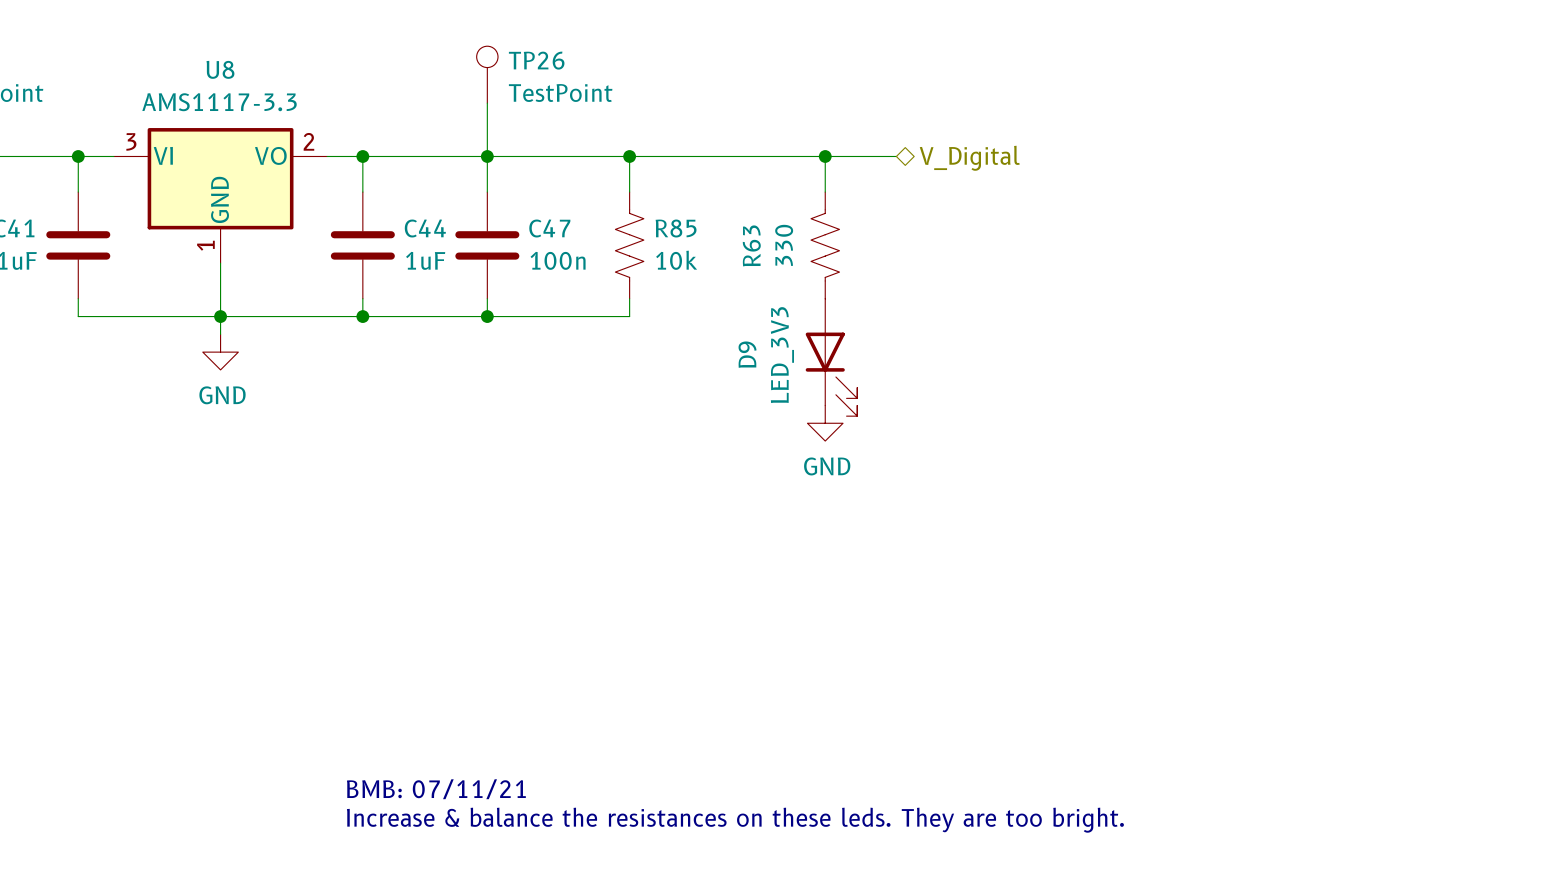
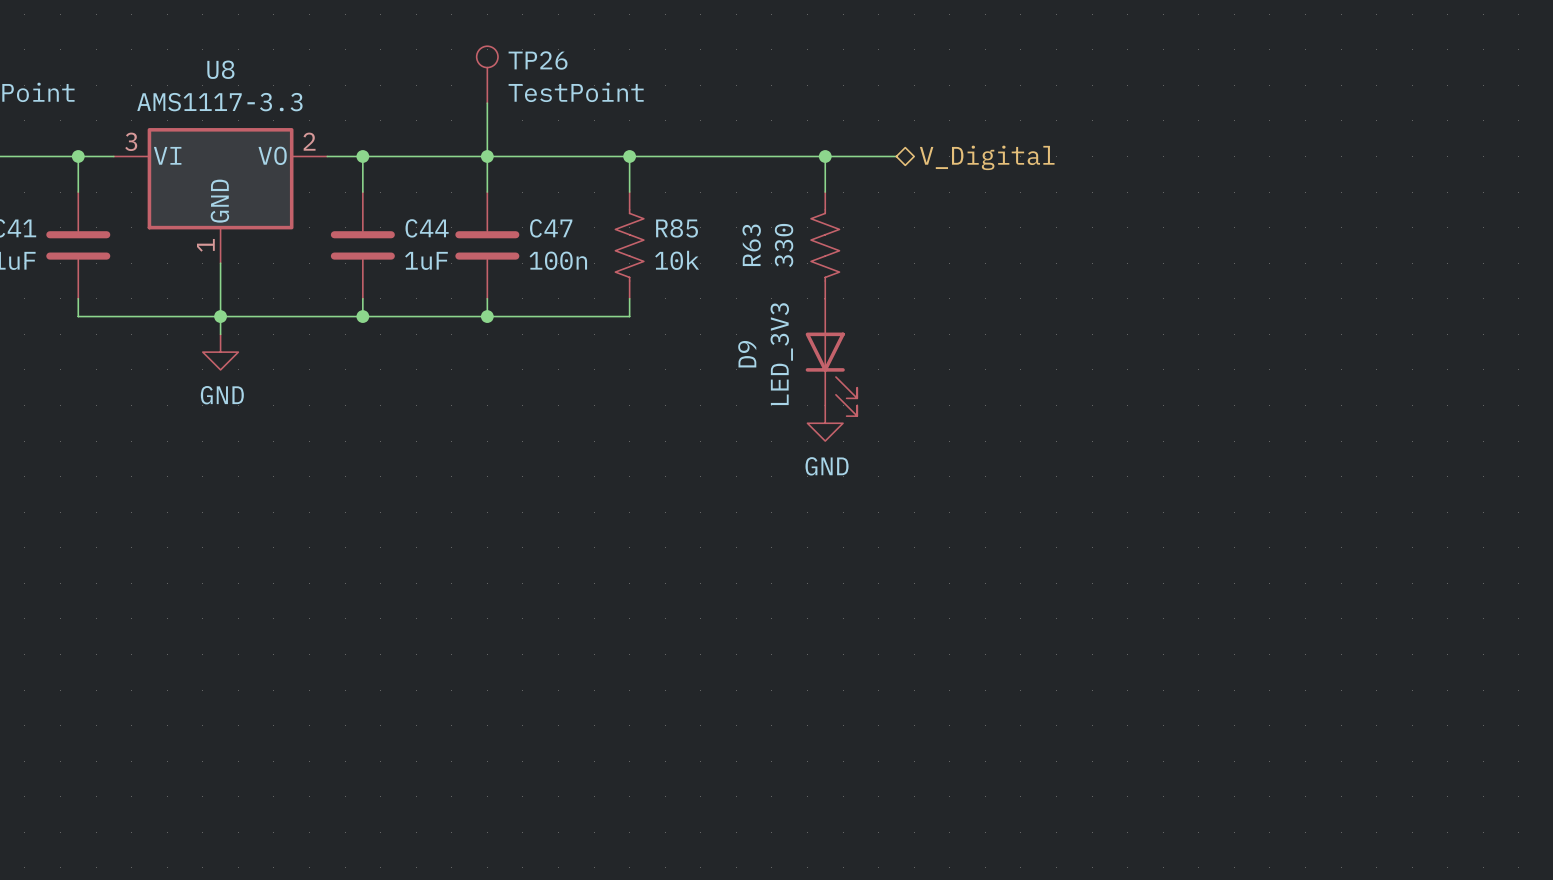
text: BMB: 07/11/21 (436, 789) -> none
text: Increase & balance the resistances on these leds. They are too bright. (735, 820) -> none

